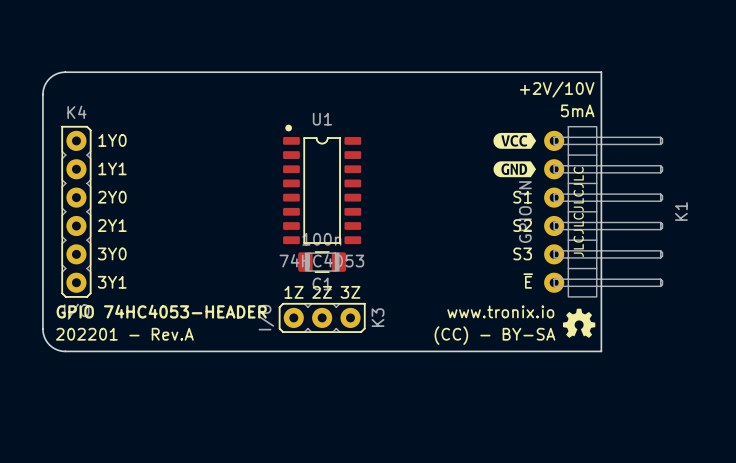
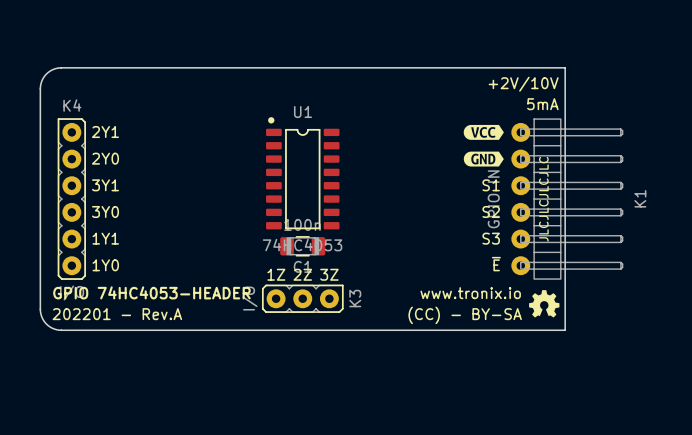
text: 1Y0 (112, 140) -> 2Y1 (105, 132)
text: 1Y1 (112, 168) -> 2Y0 (105, 158)
text: 2Y0 (112, 197) -> 3Y1 (105, 185)
text: 2Y1 (112, 225) -> 3Y0 (105, 211)
text: 3Y0 (112, 253) -> 1Y1 (105, 238)
text: 3Y1 (112, 282) -> 1Y0 (105, 265)

